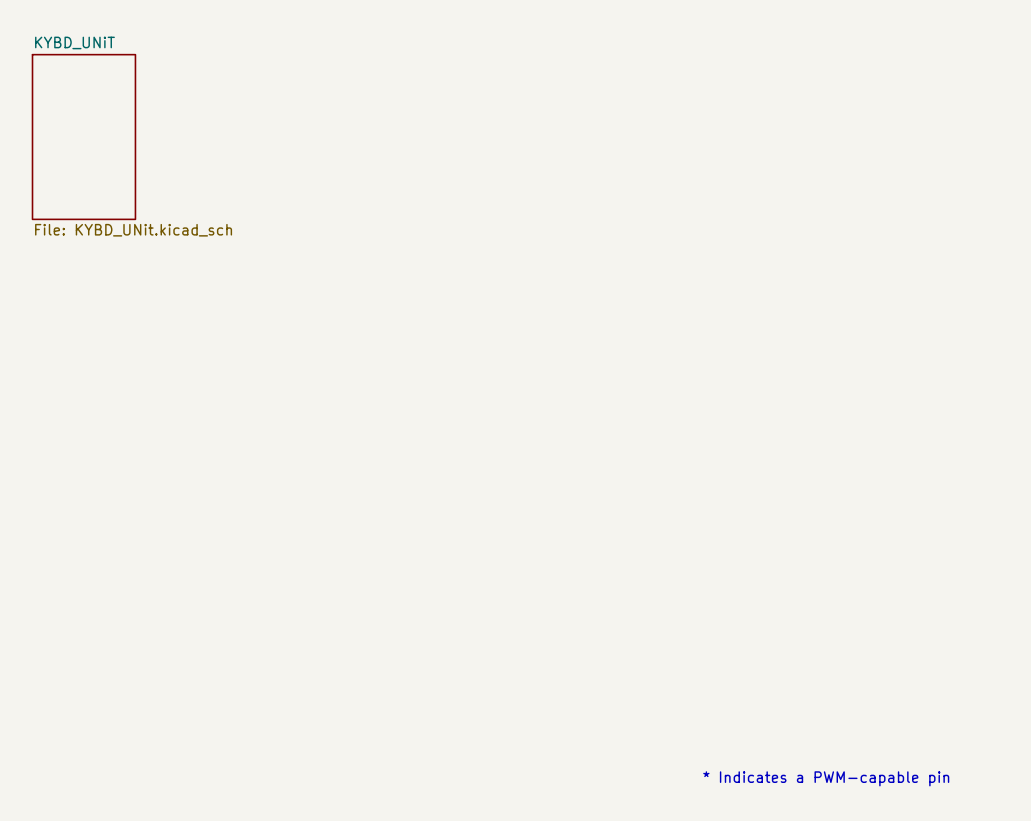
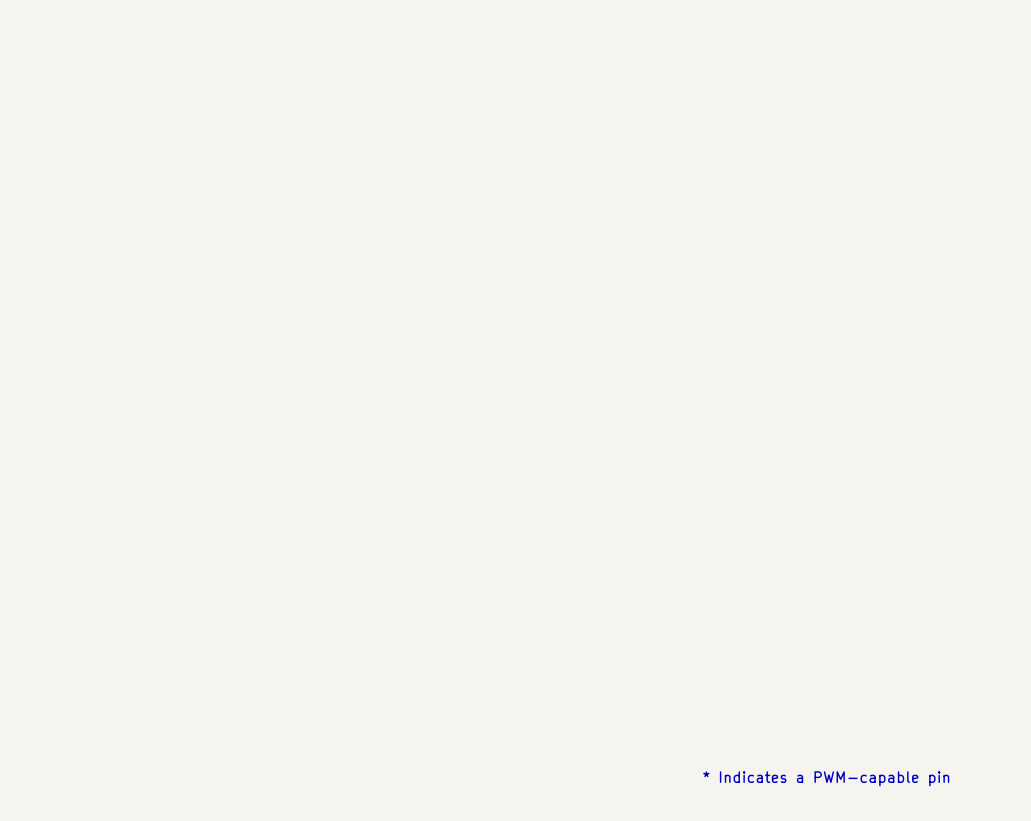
sheet KYBD_UNiT: File: KYBD_UNit.kicad_sch (83, 137) -> none

